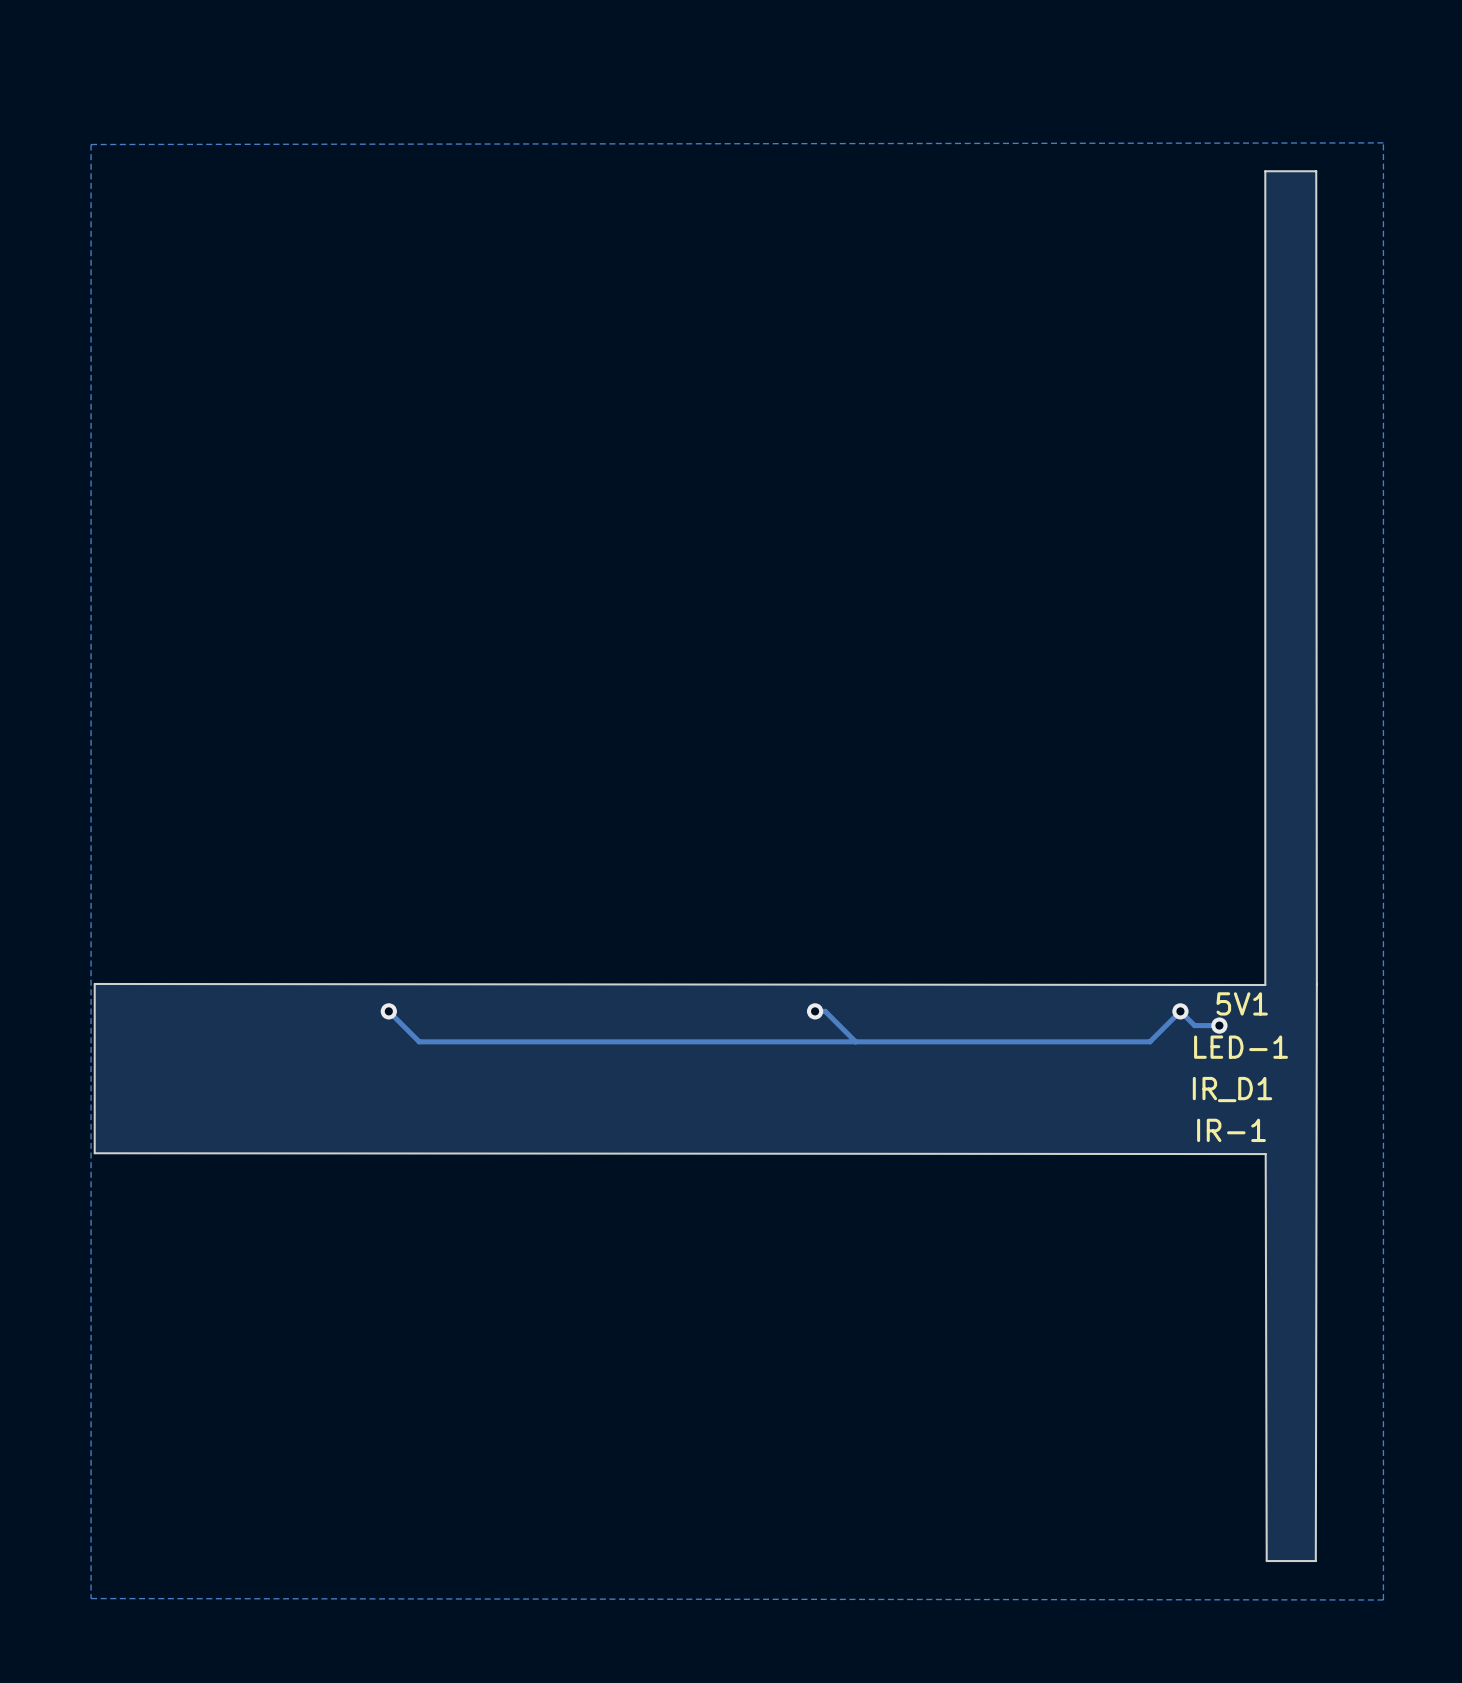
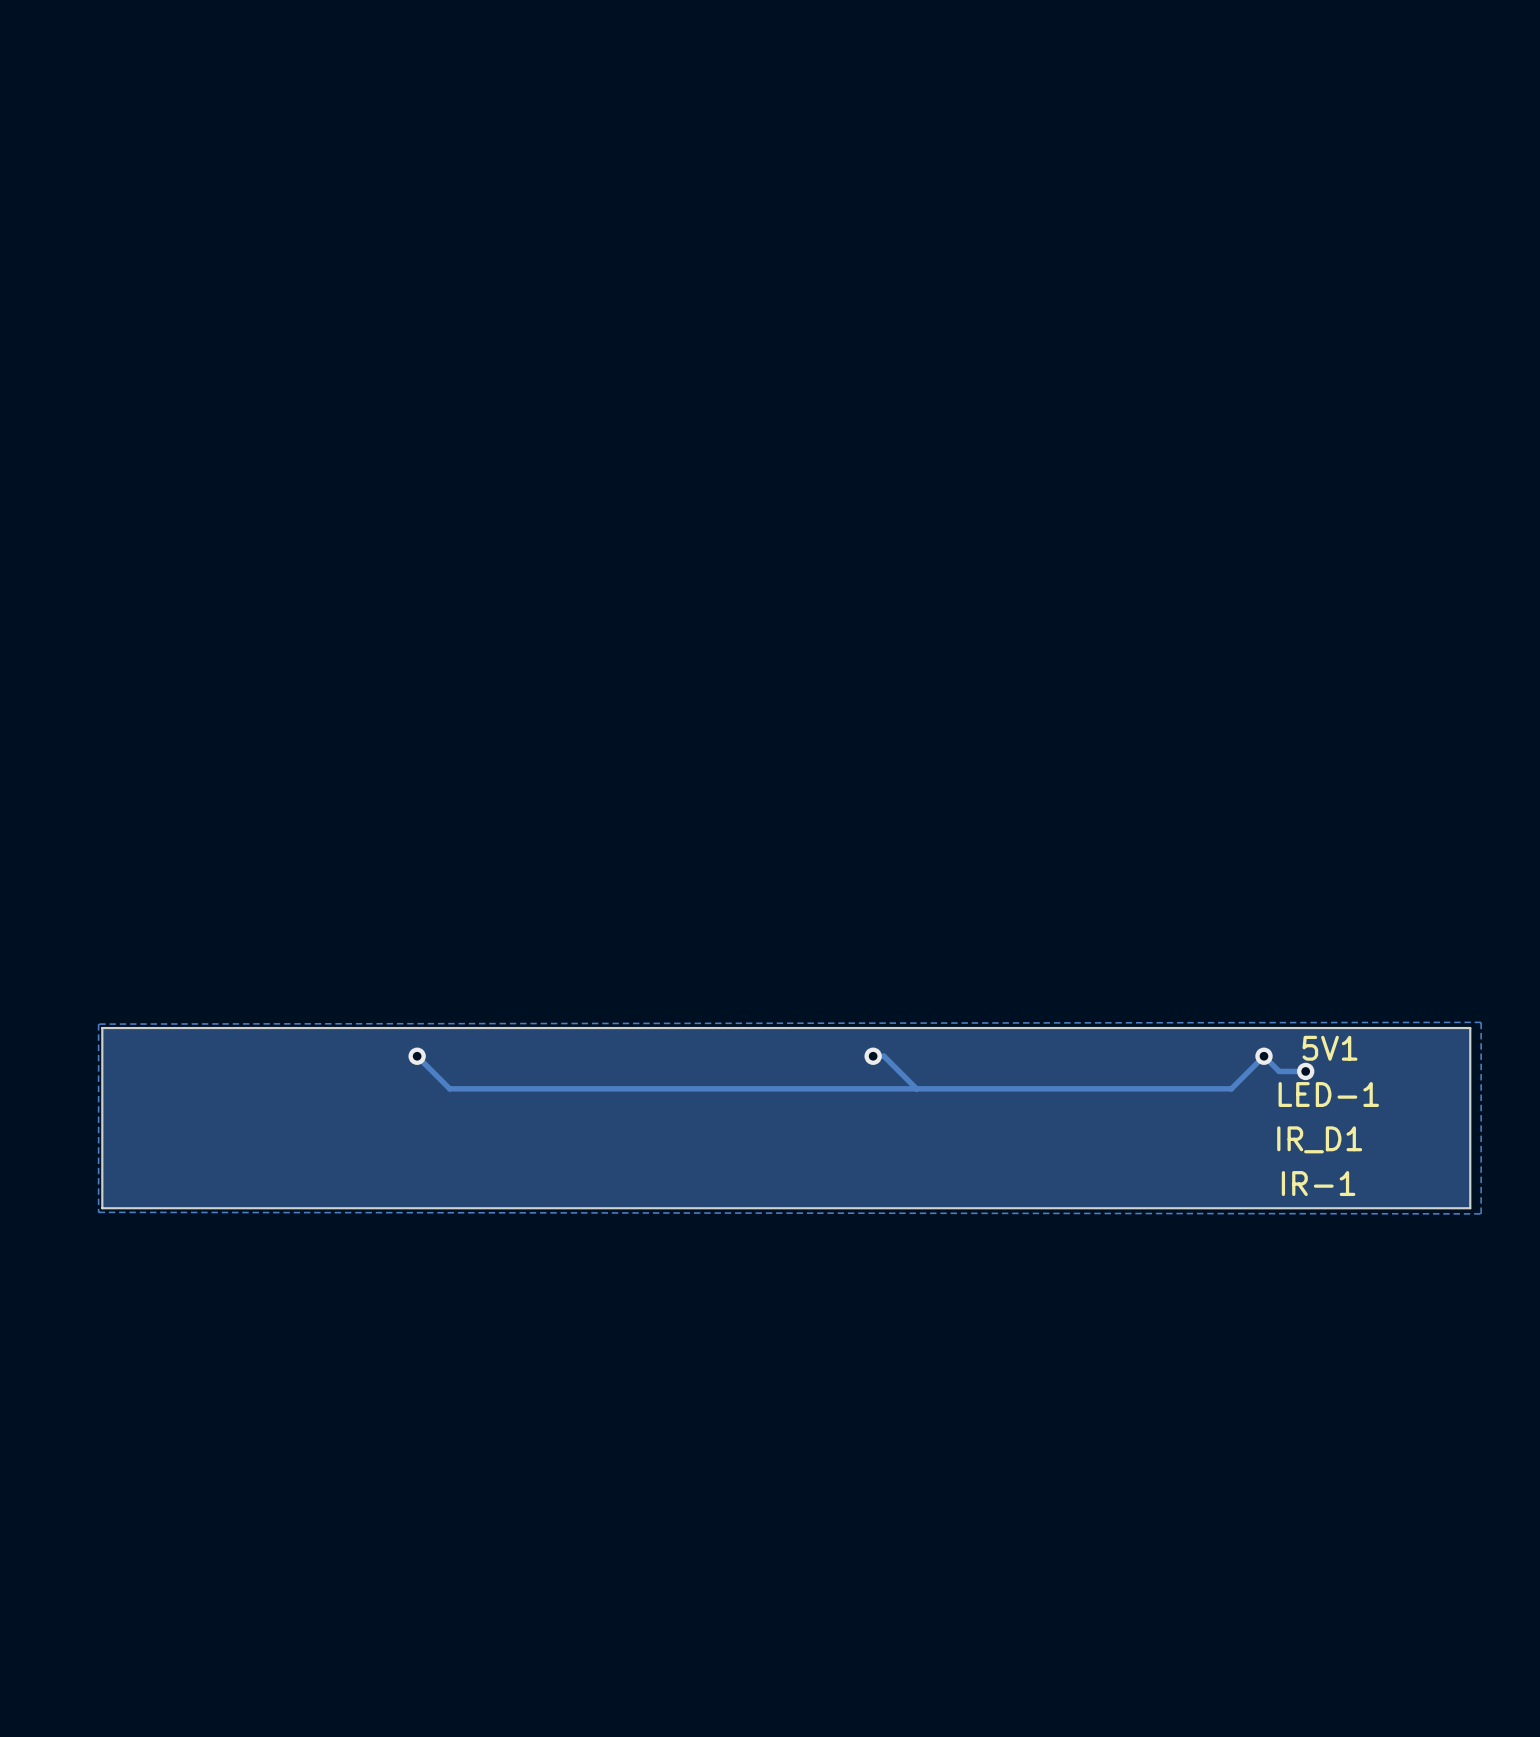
board edge: (1316, 171) (1265, 171) (1265, 984) (94, 983) (94, 1153) (1265, 1154) (1266, 1561) (1315, 1561) (1316, 171) -> none
zone outline: (1383, 979) (1383, 142) (91, 144) (91, 981) -> (1481, 1022) (98, 1024)
board edge: none -> (1470, 1028) (102, 1028) (102, 1208) (1470, 1208) (1470, 1028)
zone outline: (91, 1157) (91, 1598) (1383, 1599) (1383, 1158) -> (98, 1212) (1481, 1213)

